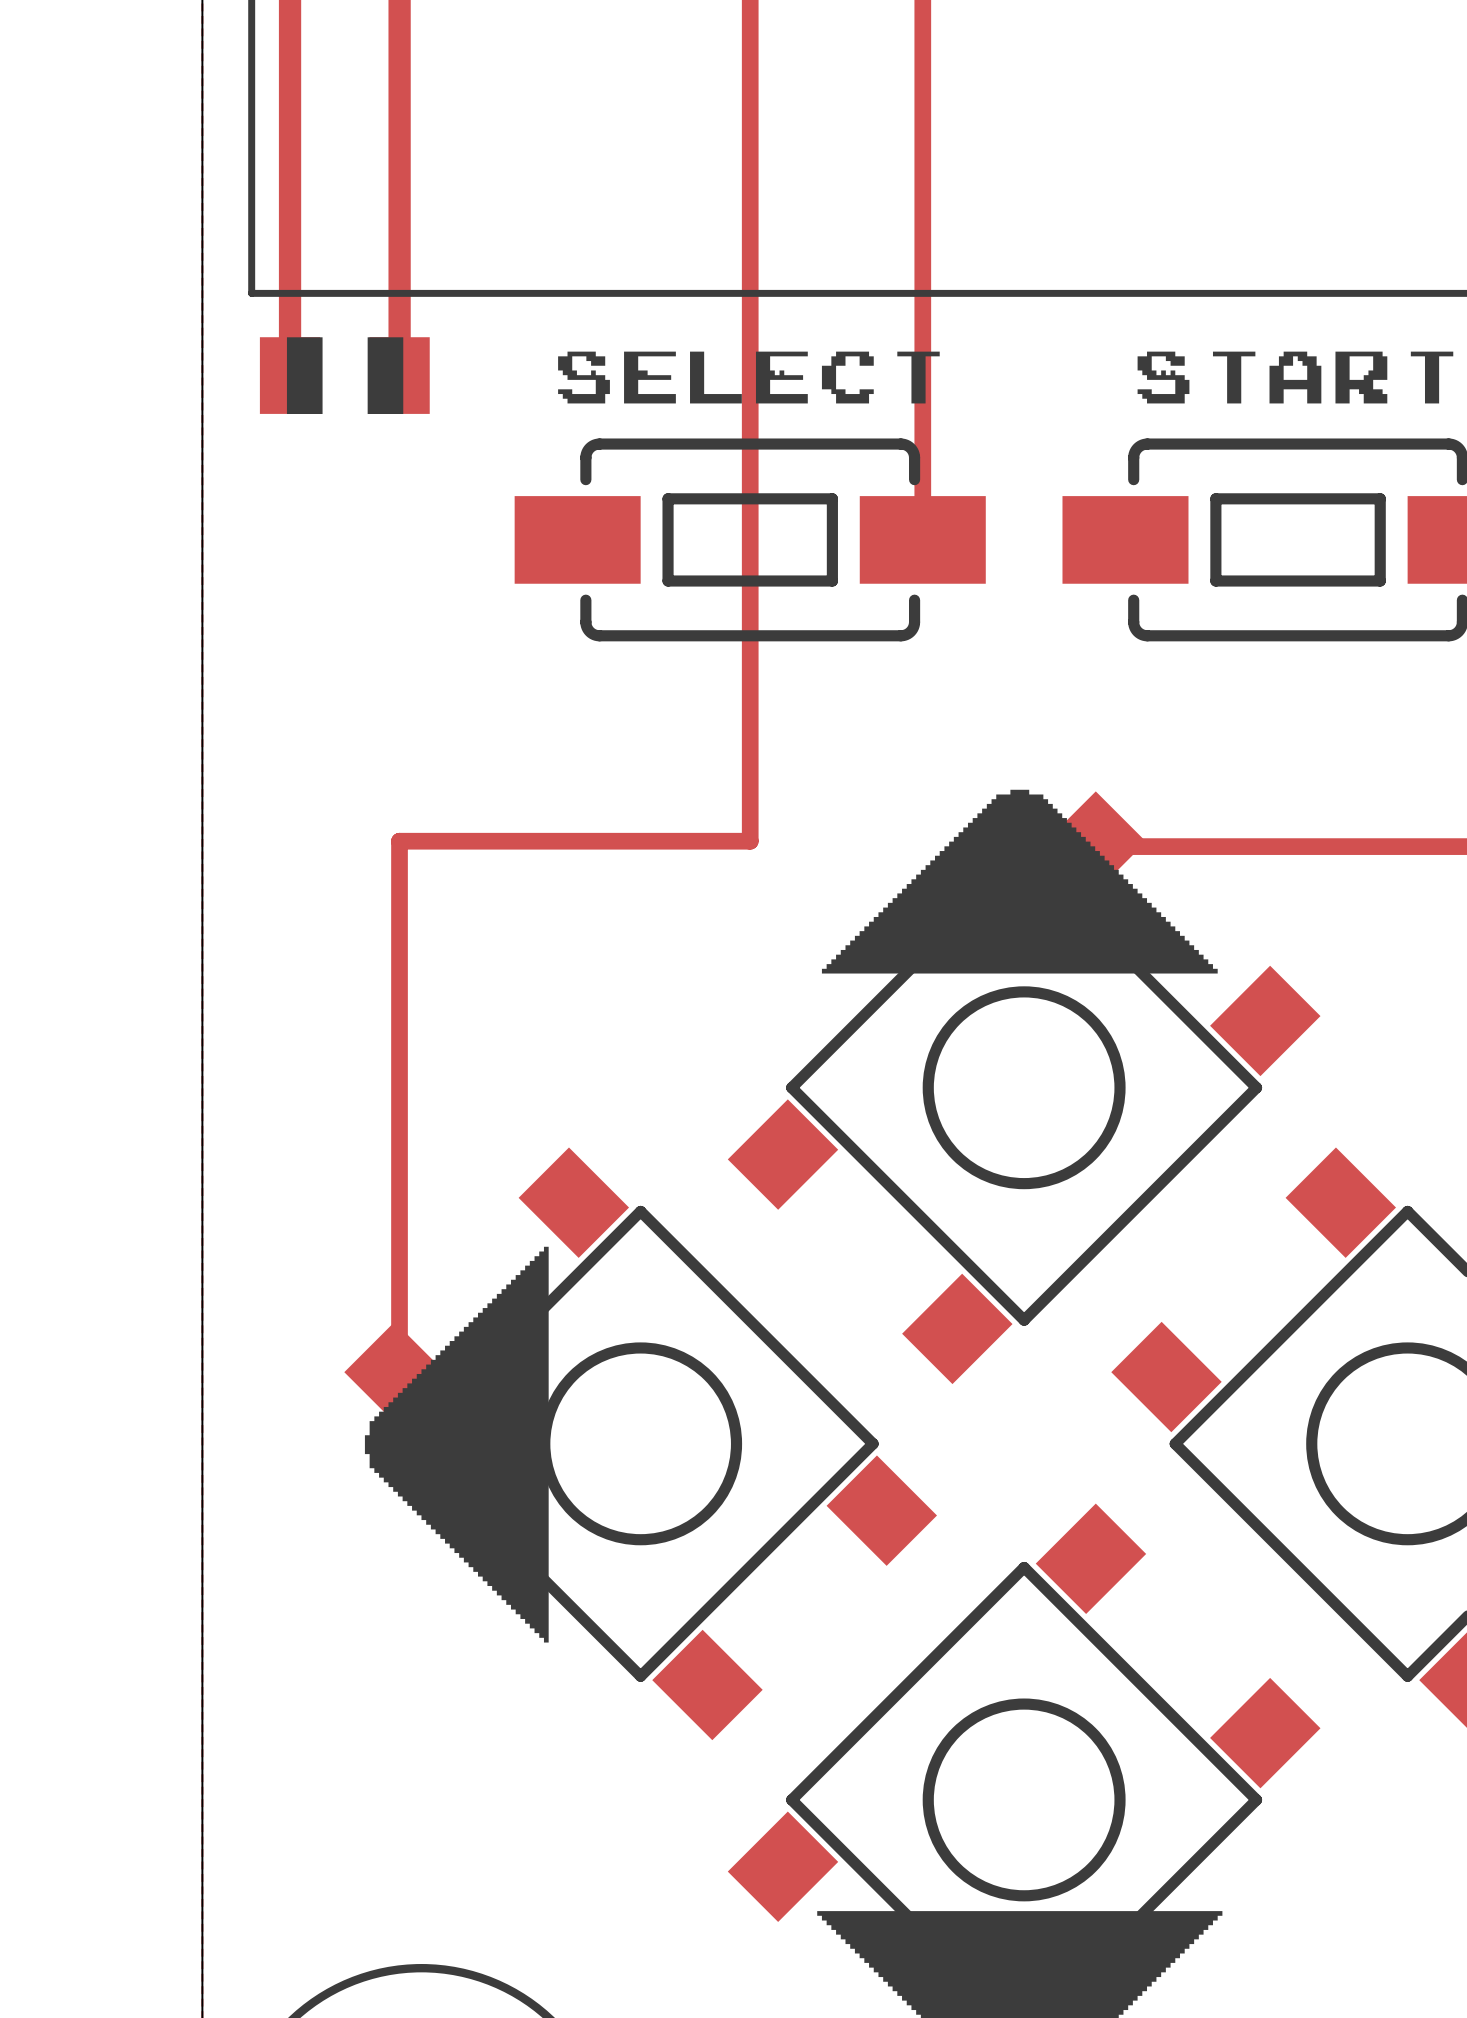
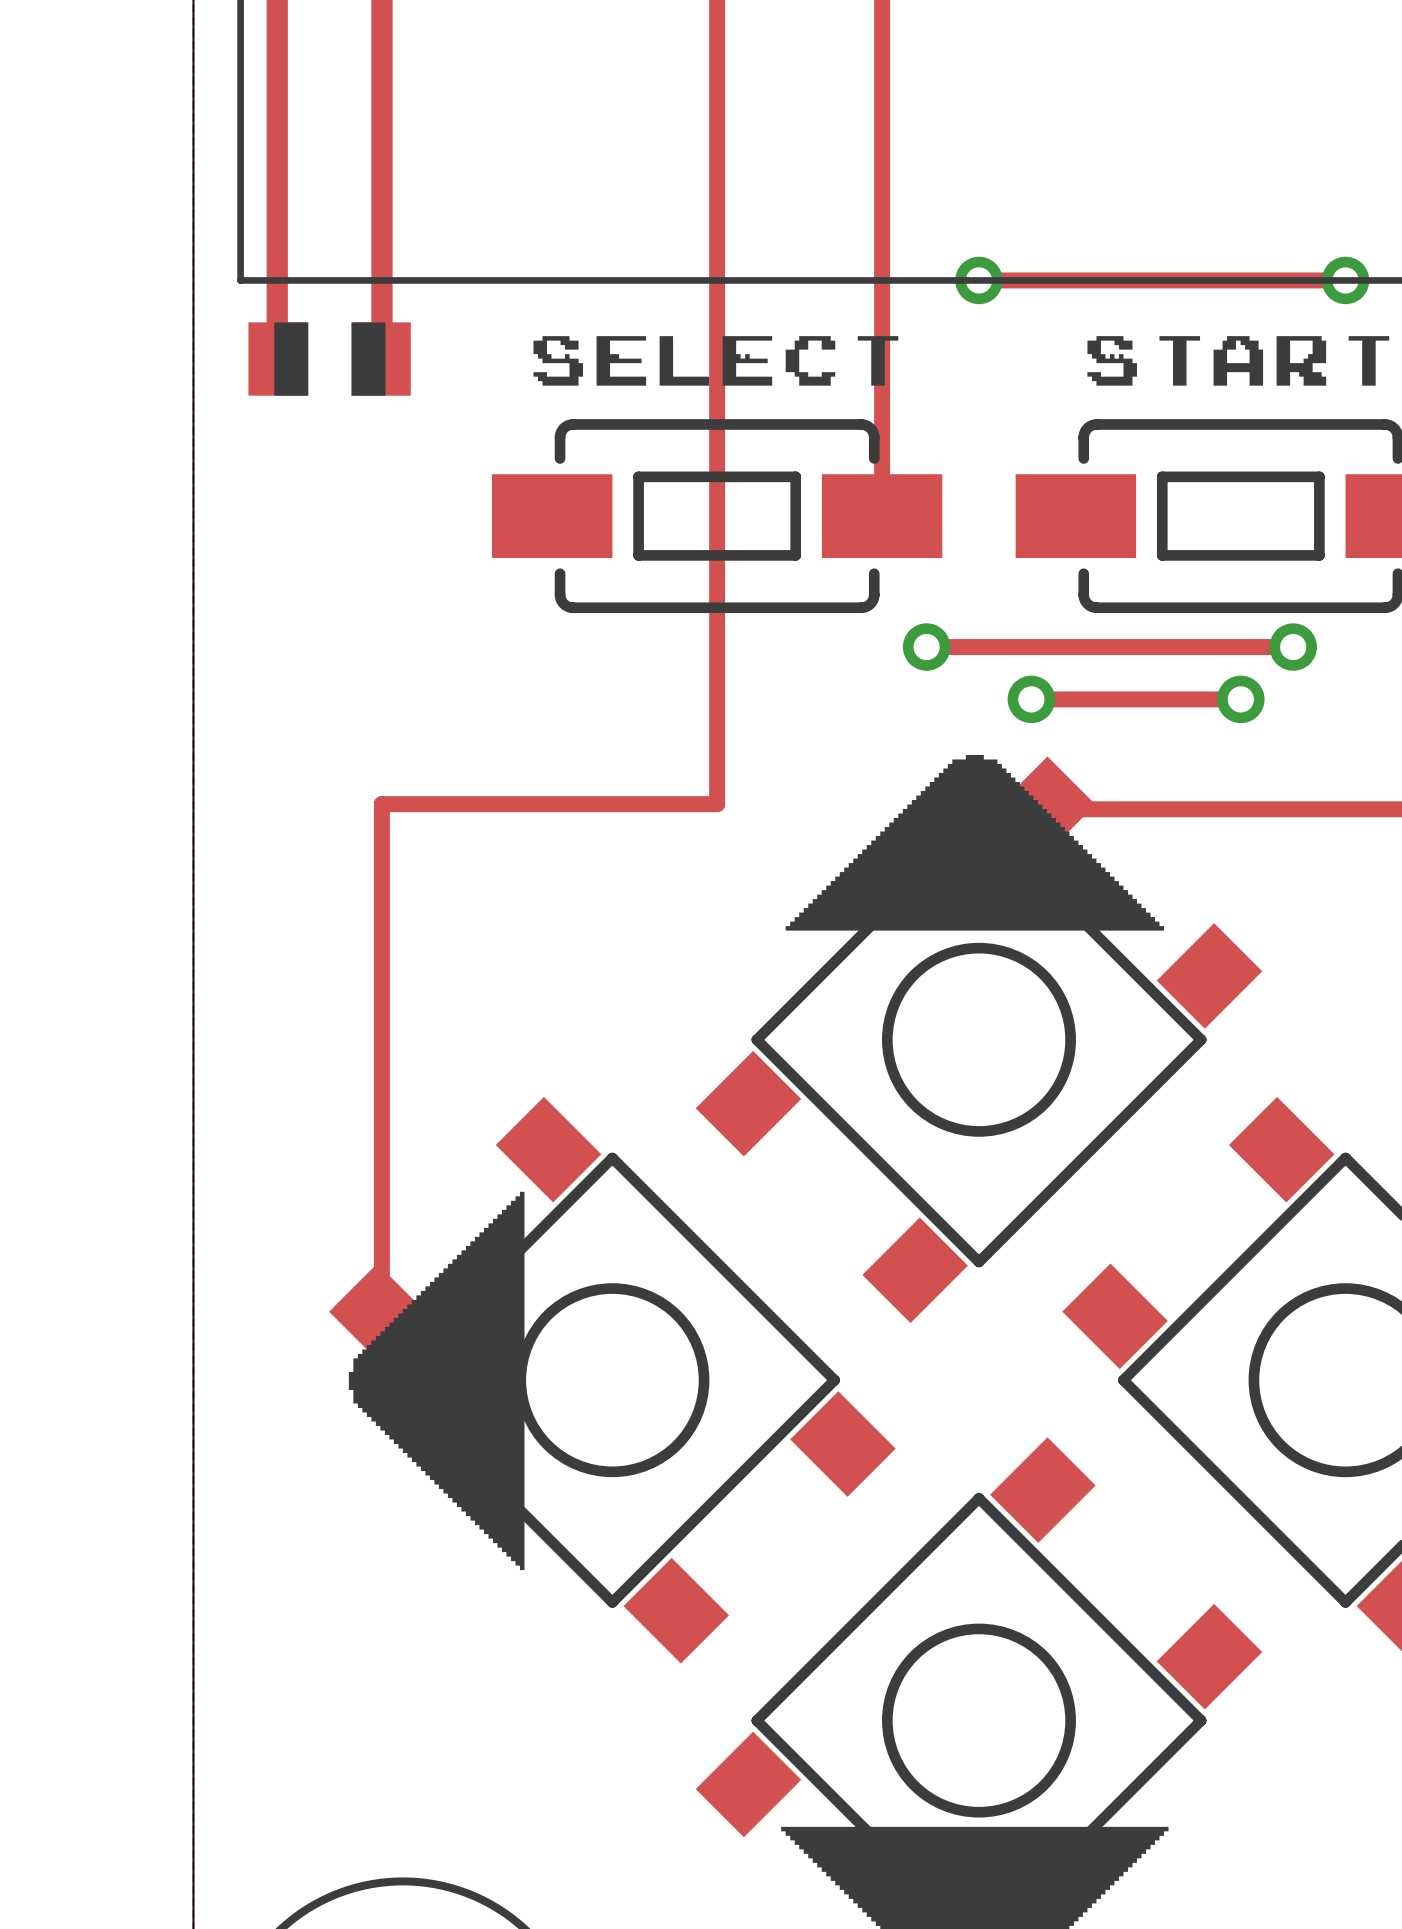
track: none -> (978, 280) (1345, 280)
via: none -> (978, 280)
via: none -> (1345, 280)
track: none -> (926, 647) (1293, 647)
via: none -> (926, 647)
via: none -> (1293, 647)
track: none -> (1031, 699) (1240, 699)
via: none -> (1031, 699)
via: none -> (1240, 699)

